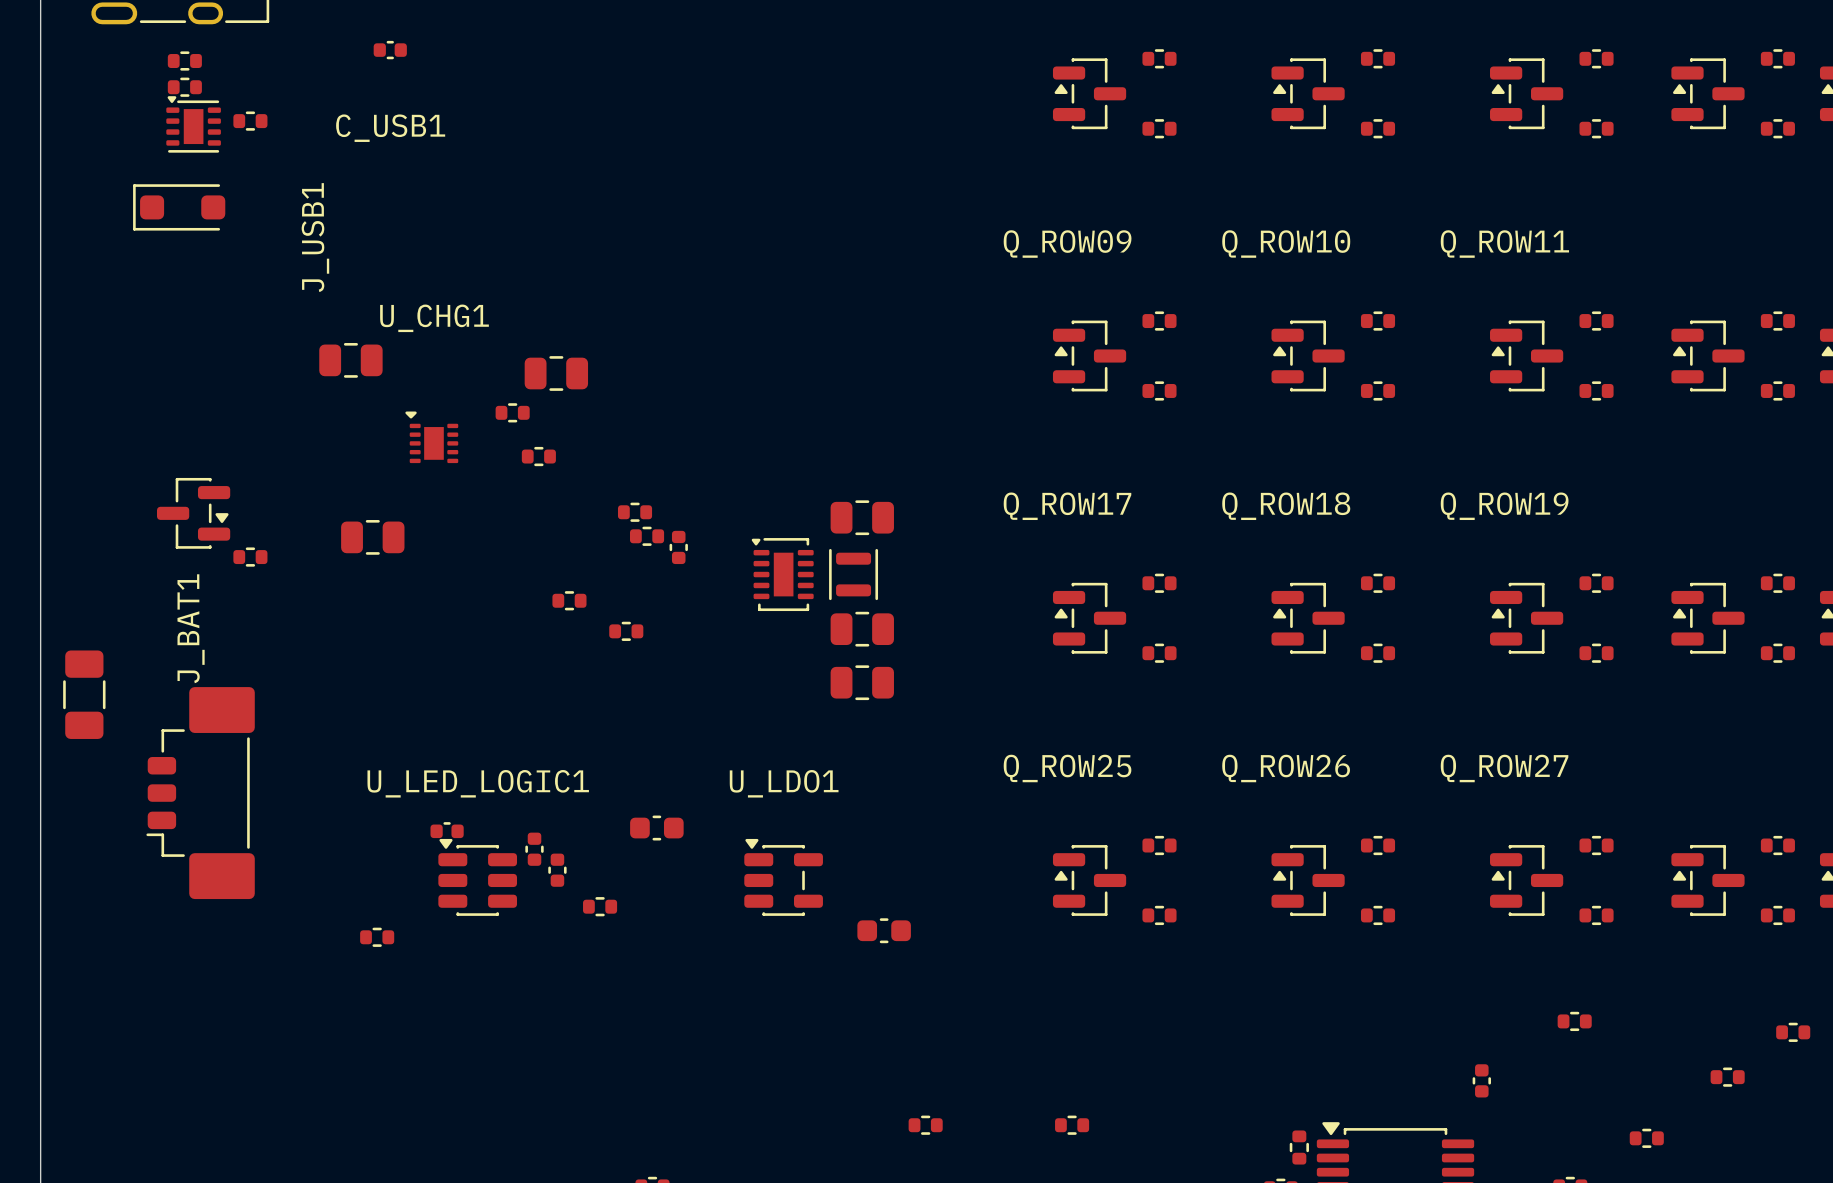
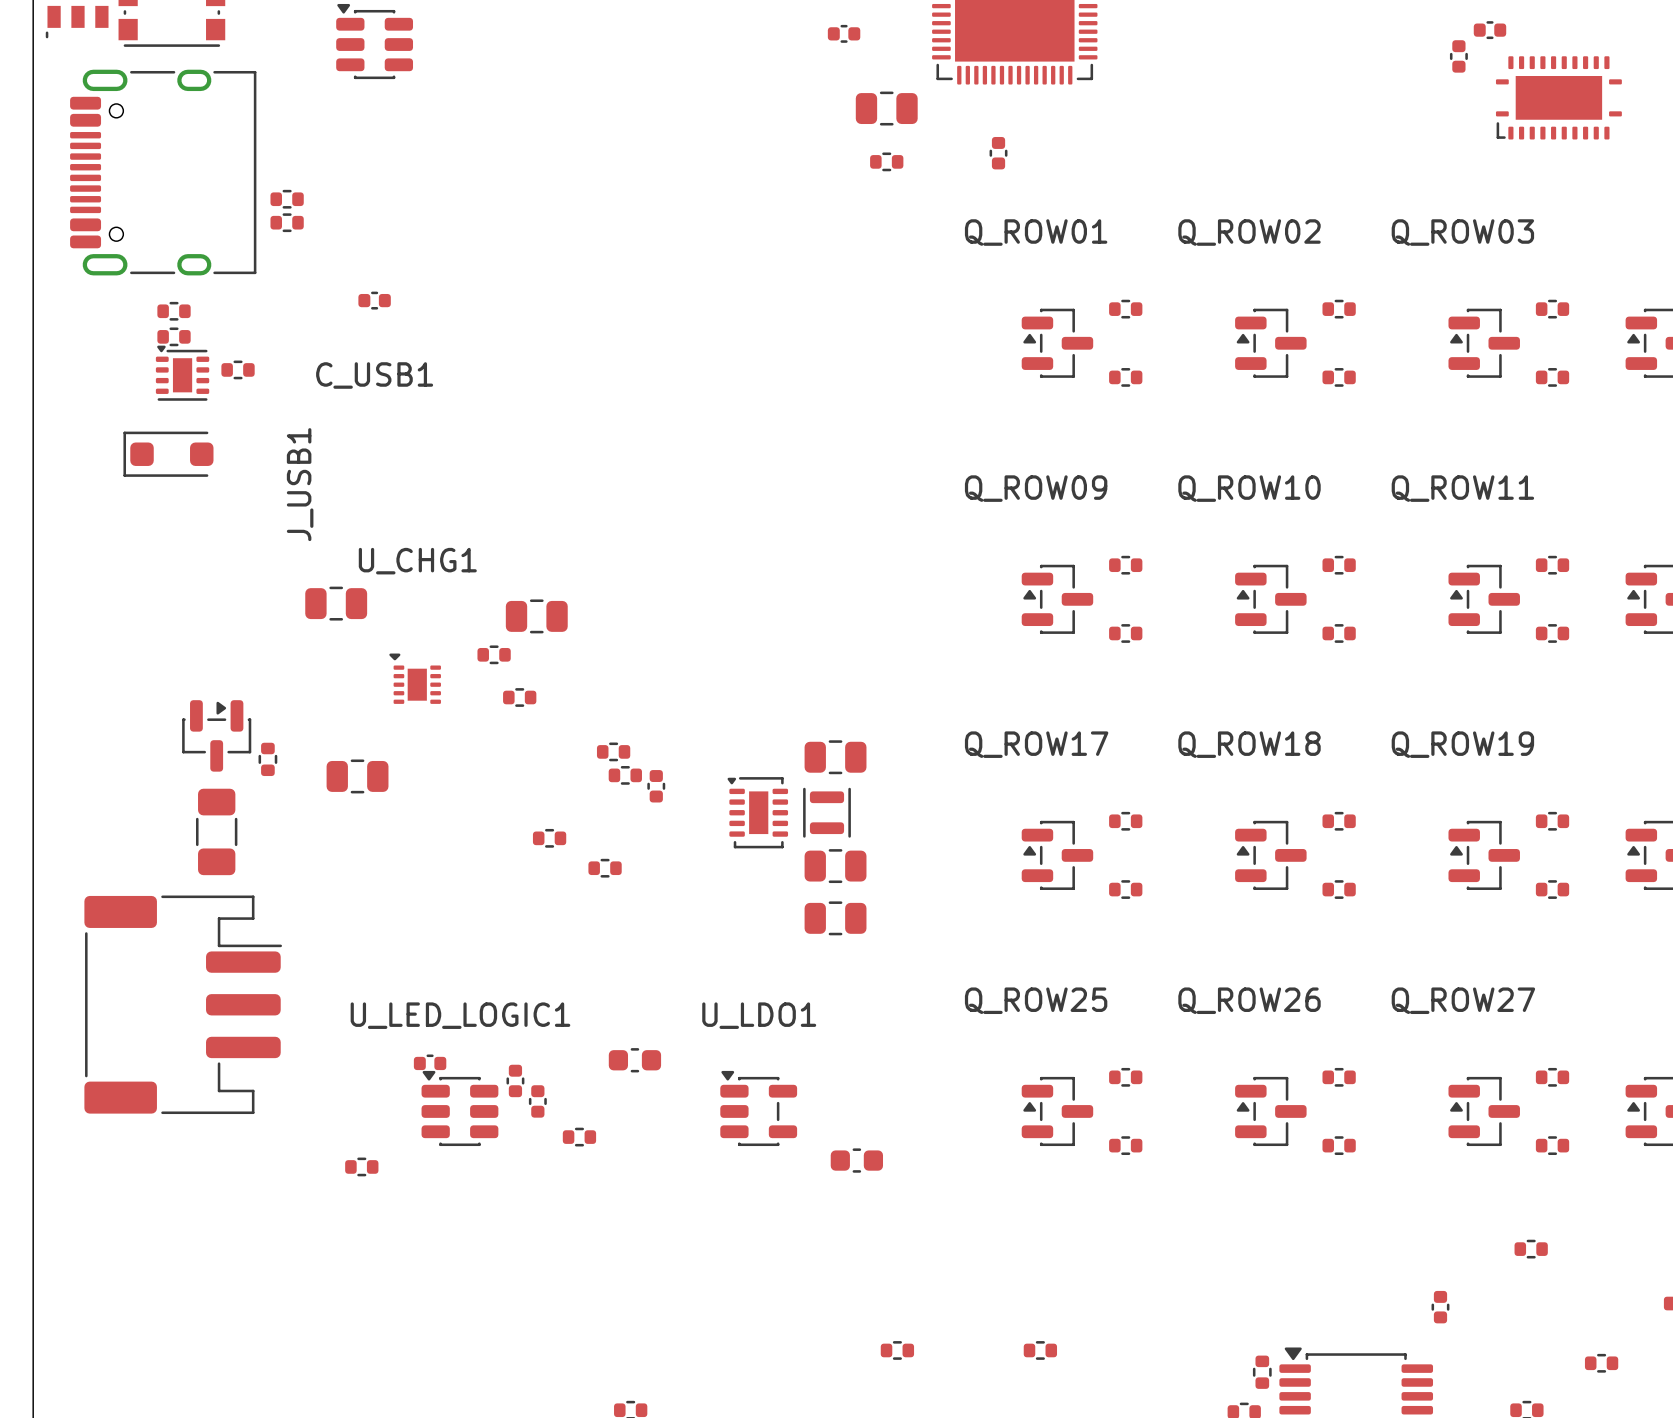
part rotation: 0° (193, 513) -> 90° counterclockwise (216, 735)
part rotation: 0° (250, 557) -> 90° clockwise (267, 759)
part position: (250, 557) -> (267, 759)
part position: (84, 694) -> (216, 831)
part: none -> (183, 1004)
J_BAT1: (200, 793) -> none

